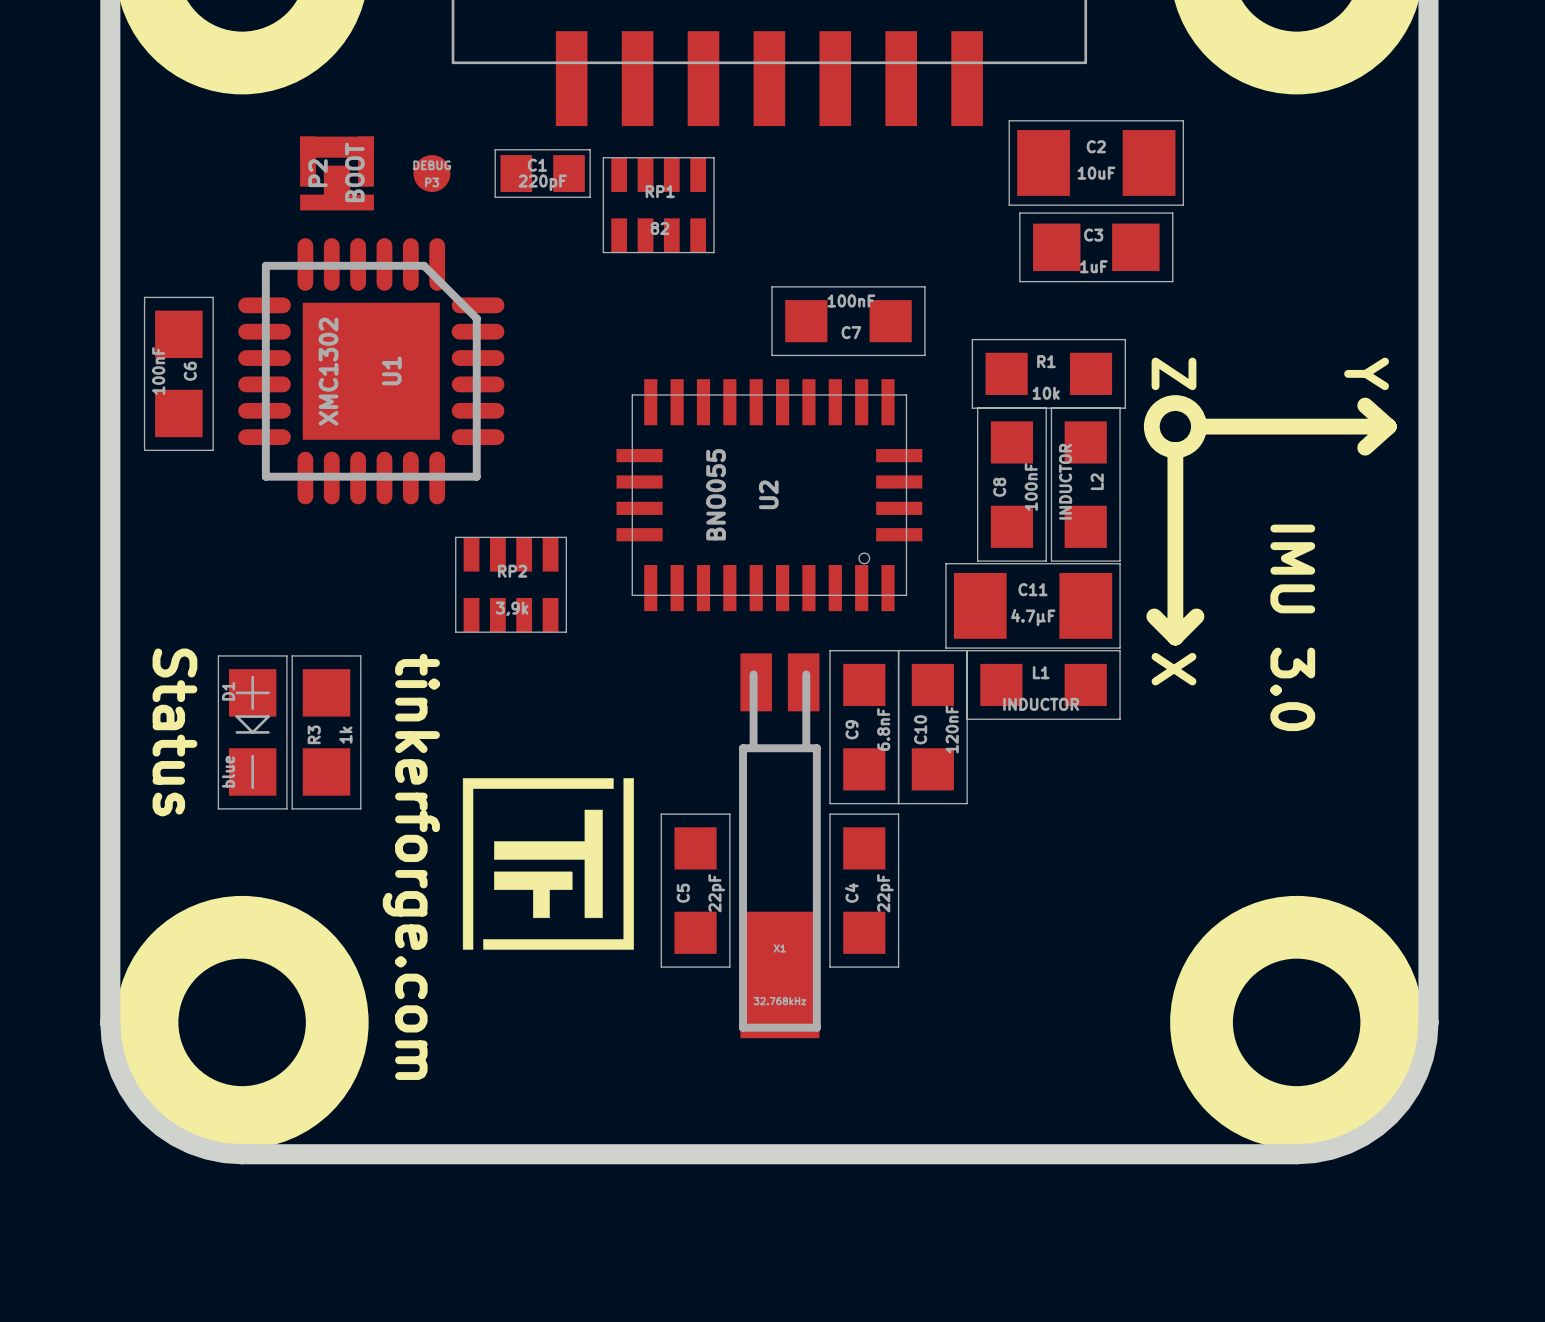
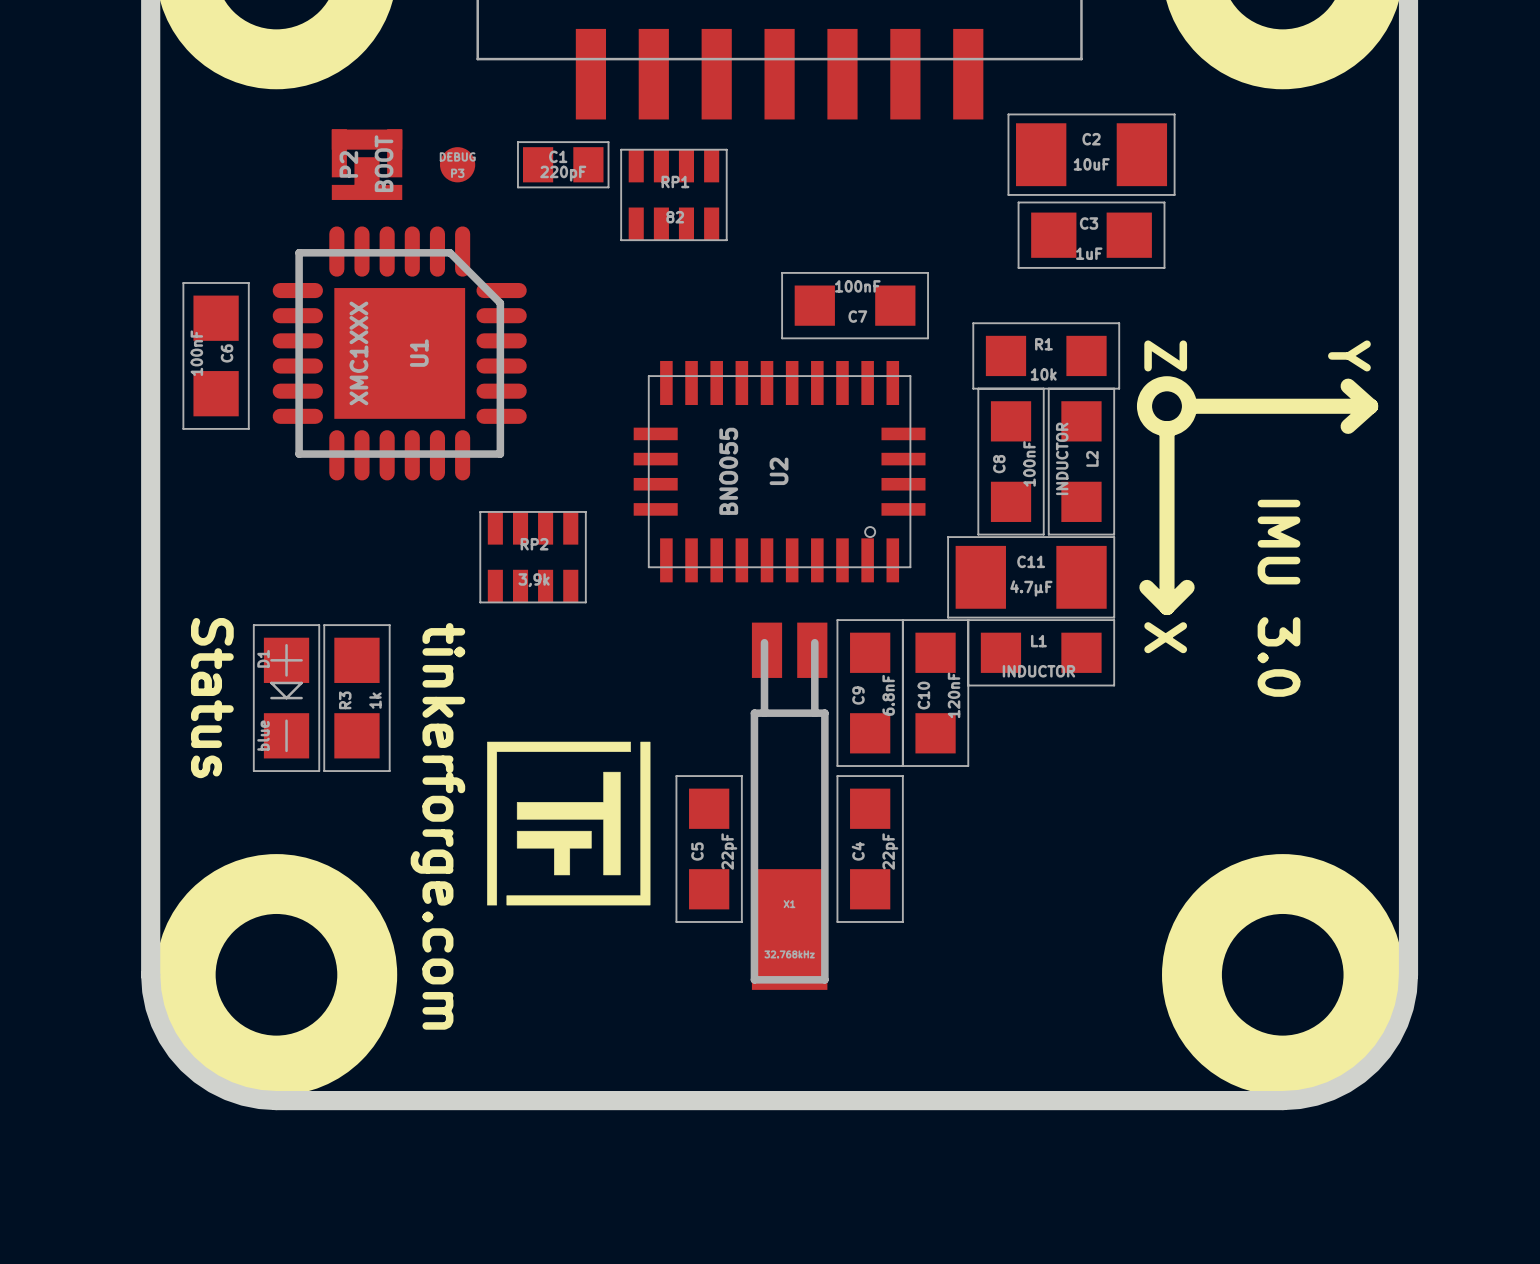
U1 value: XMC1302 (328, 371) -> XMC1XXX (358, 353)

